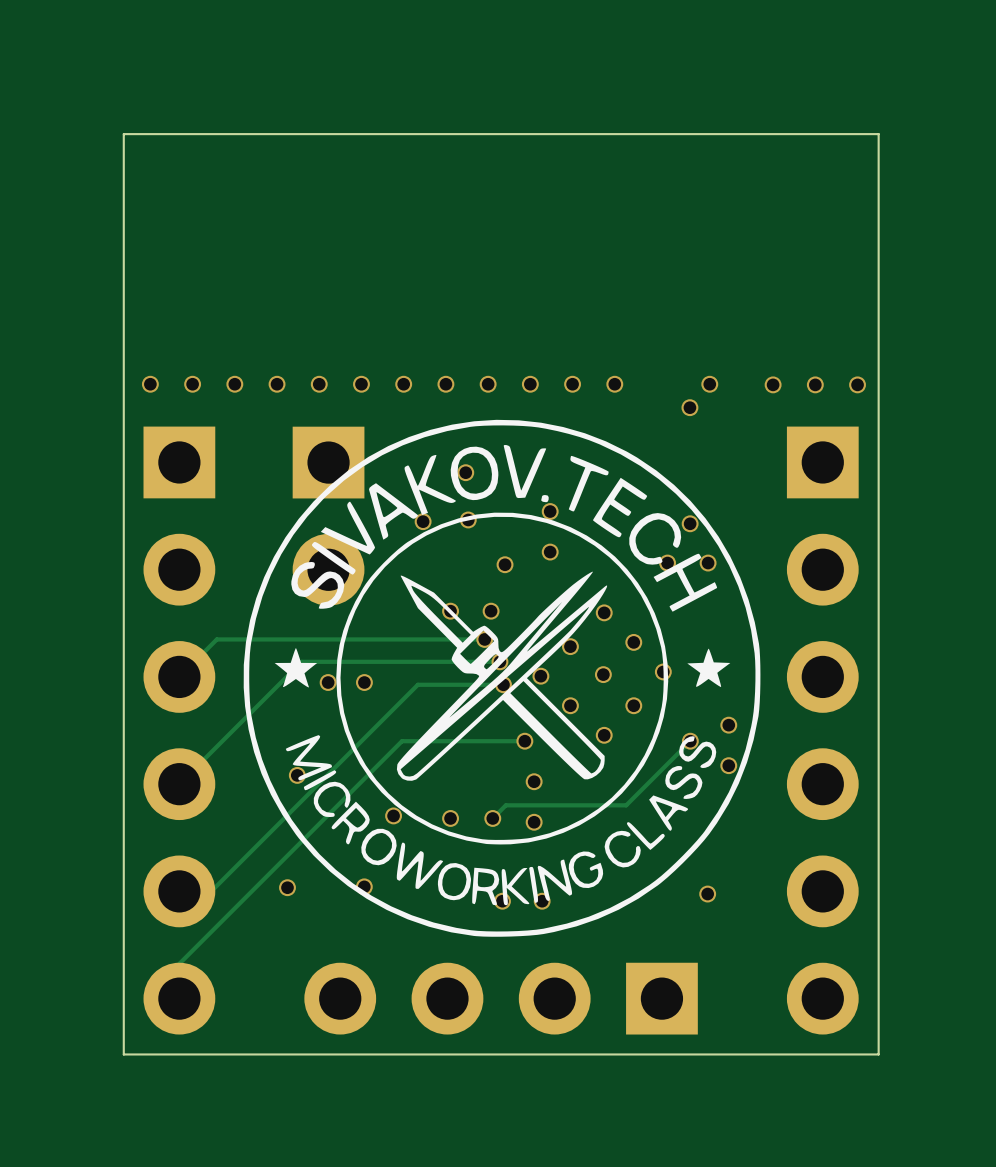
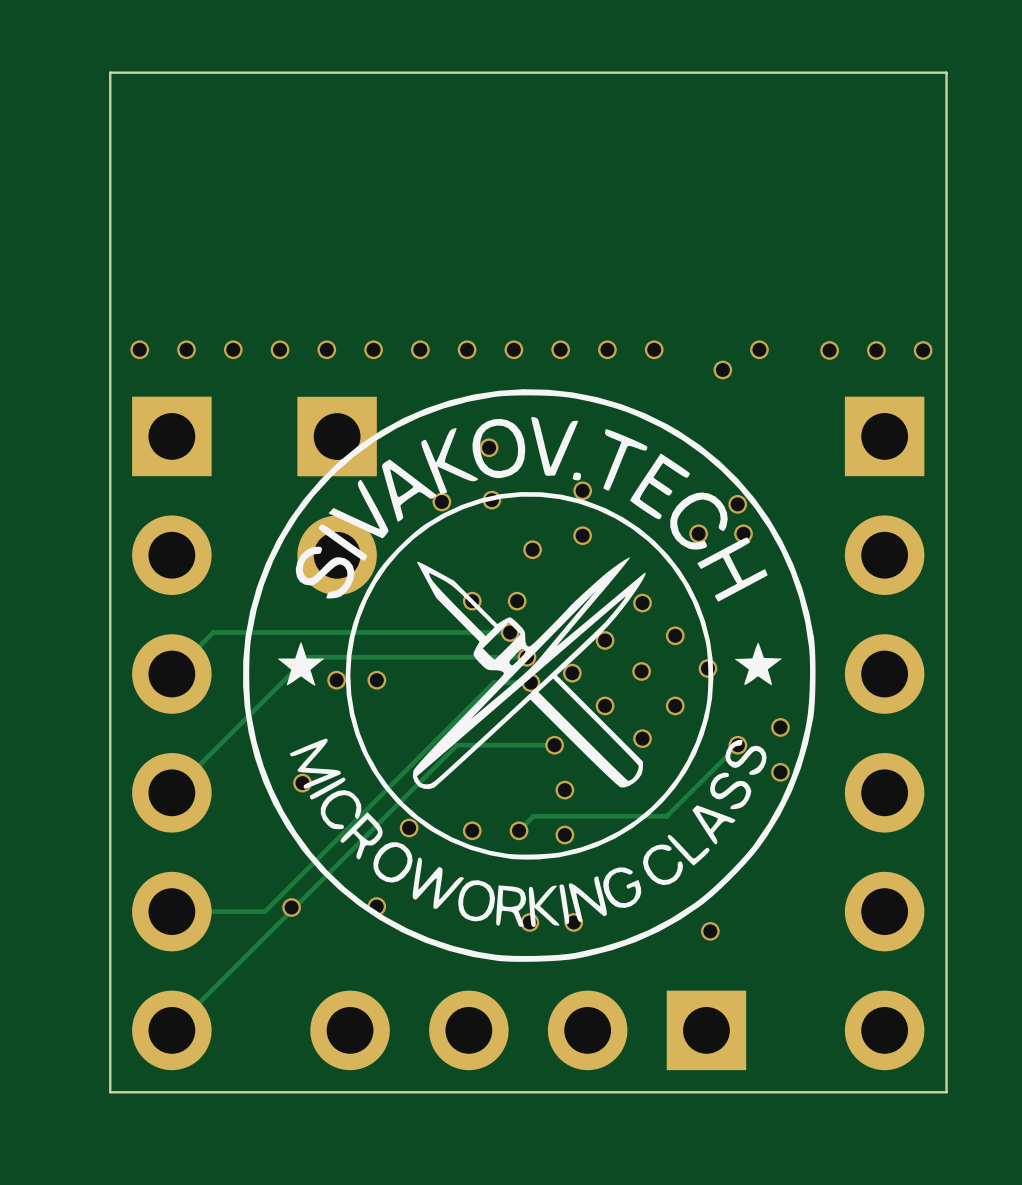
via position: (689, 407) -> (722, 369)
via position: (667, 563) -> (698, 533)
via position: (708, 563) -> (743, 533)
track: (470, 684) (417, 684) (211, 891) -> (493, 682) (264, 911) (207, 911)
track: (436, 741) (402, 741) (179, 963) (179, 998) -> (457, 745) (171, 1030)
via position: (707, 894) -> (710, 931)

